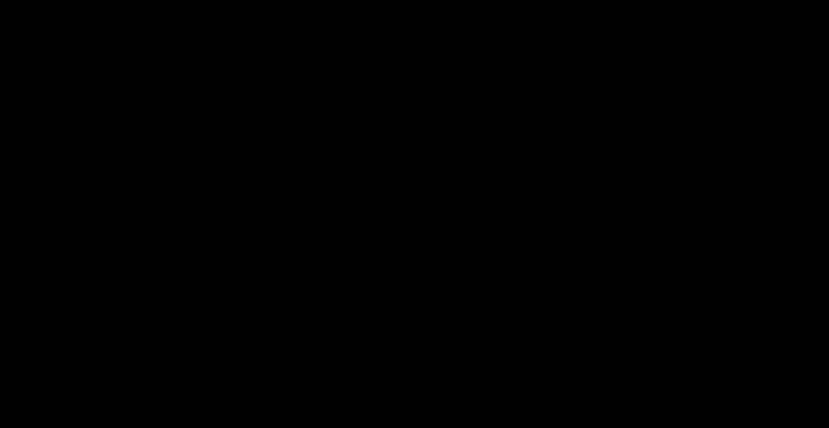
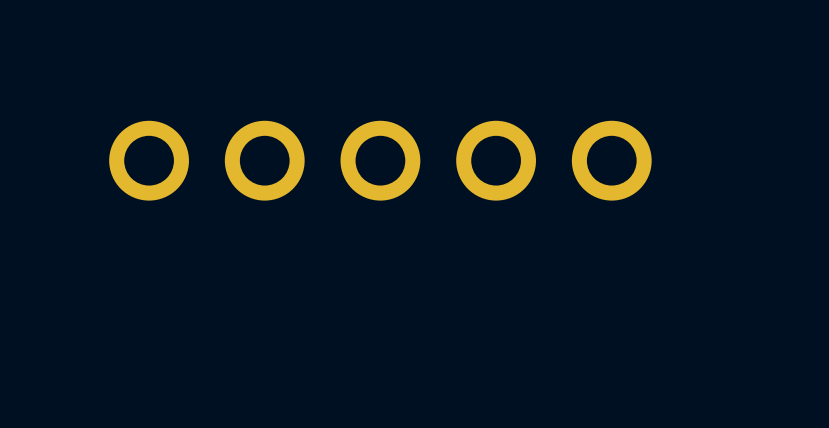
part: none -> (380, 160)

